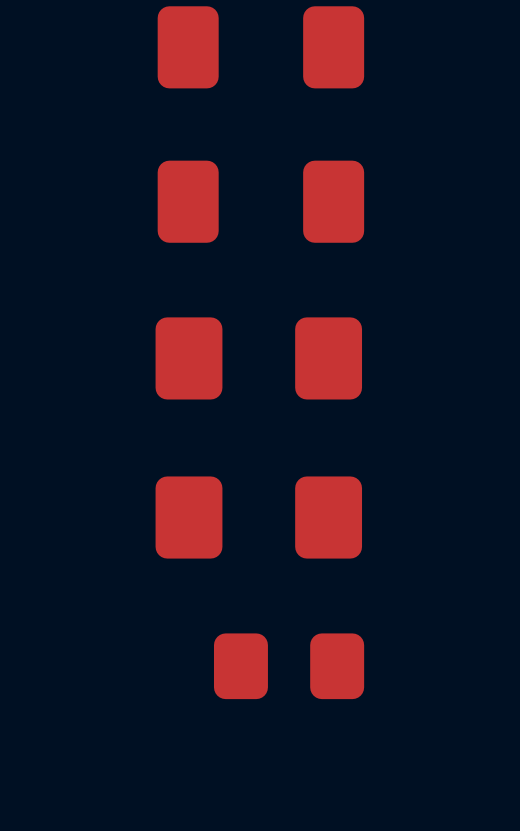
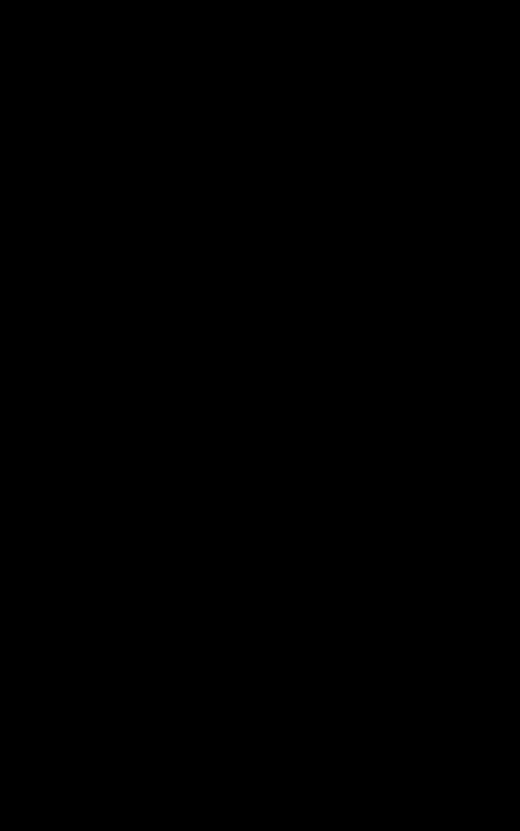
part: (260, 47) -> none
part: (260, 201) -> none
part: (258, 358) -> none
part: (258, 517) -> none
part: (289, 666) -> none

